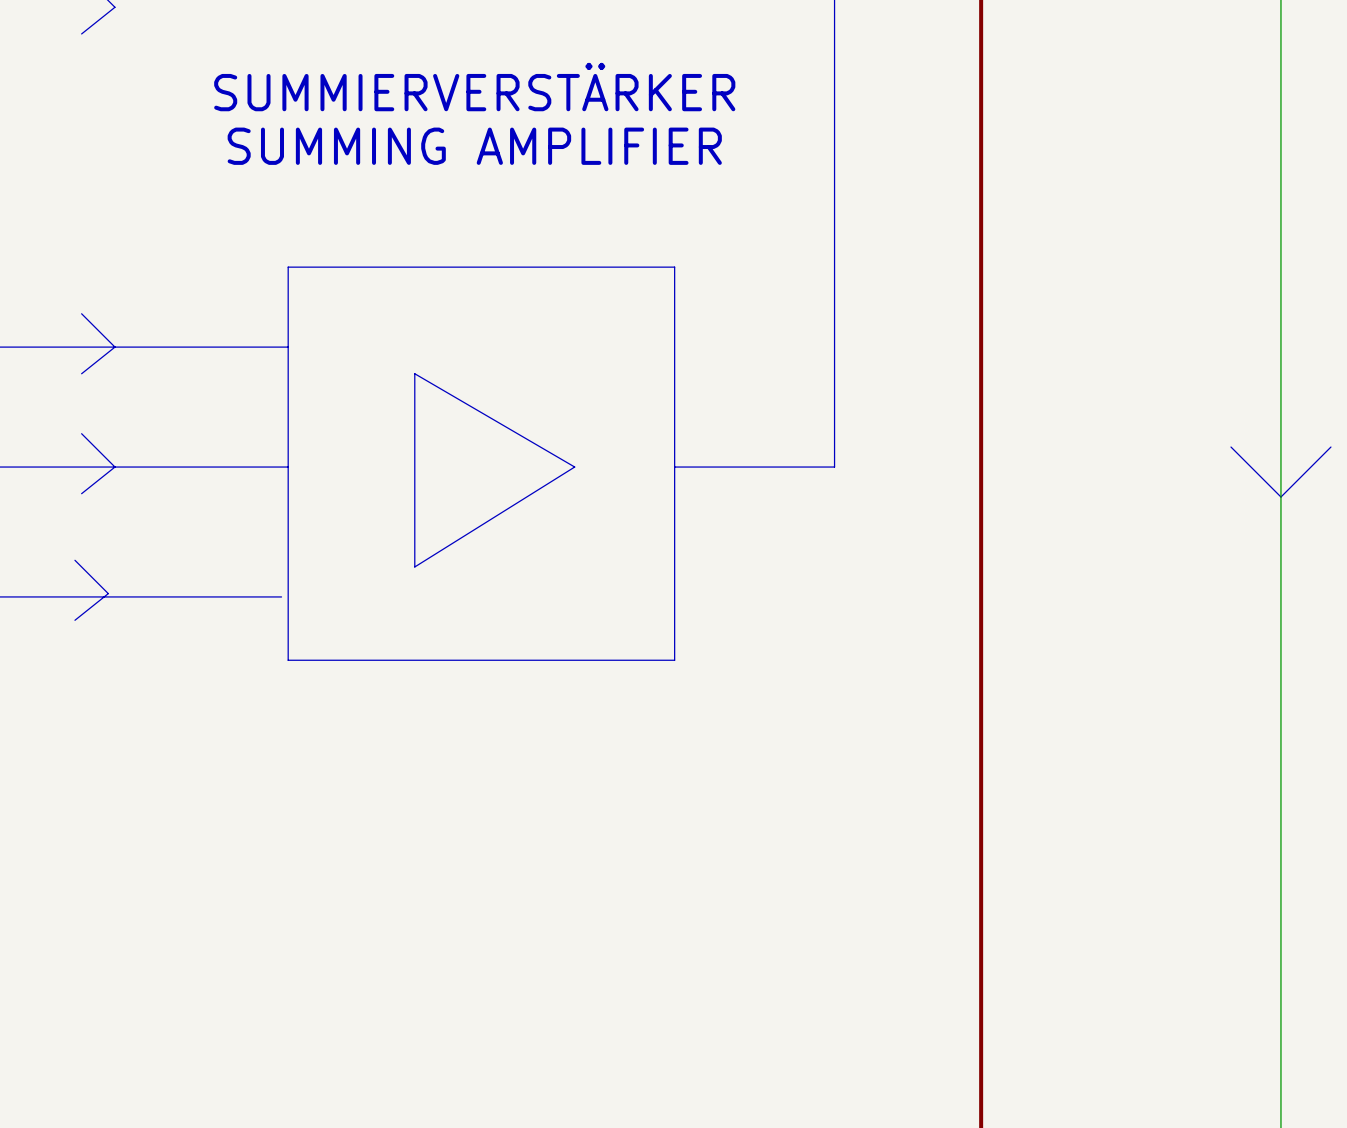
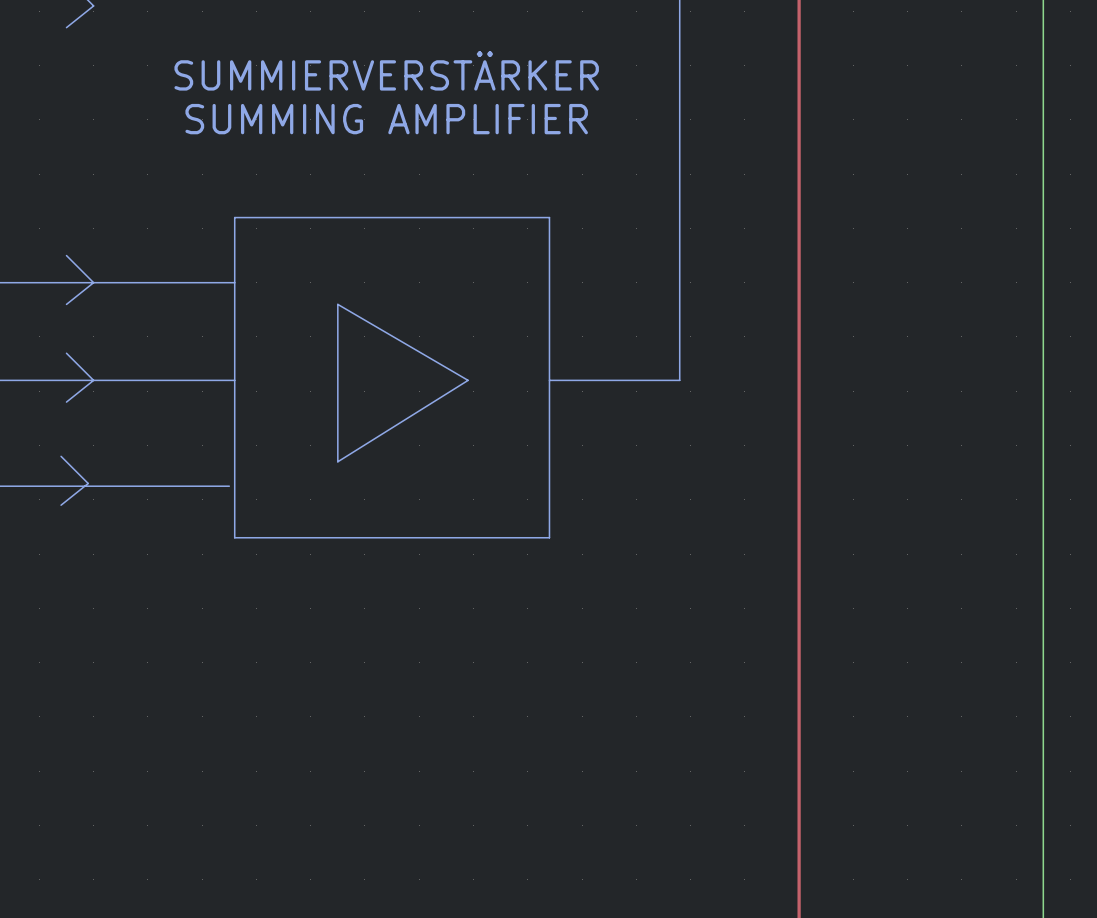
line: (1231, 447) (1280, 497) (1330, 447) -> none

